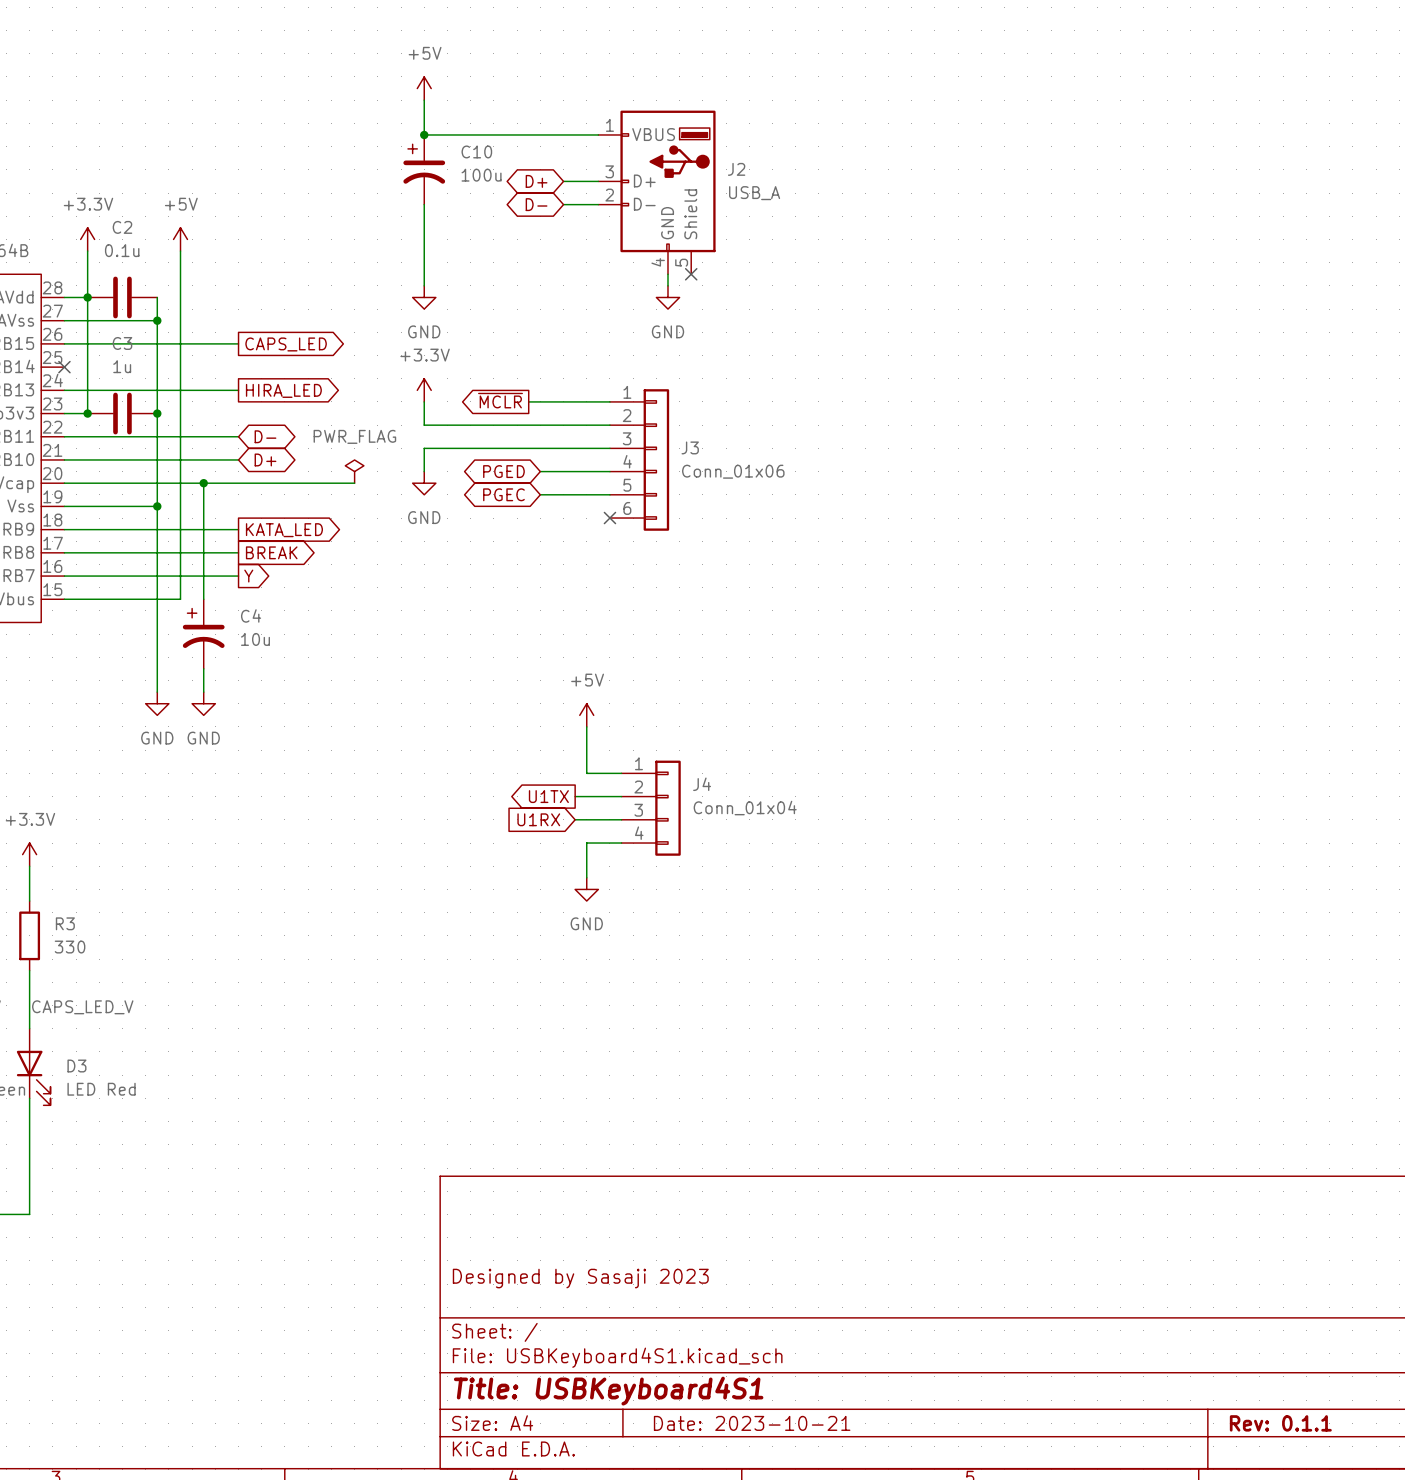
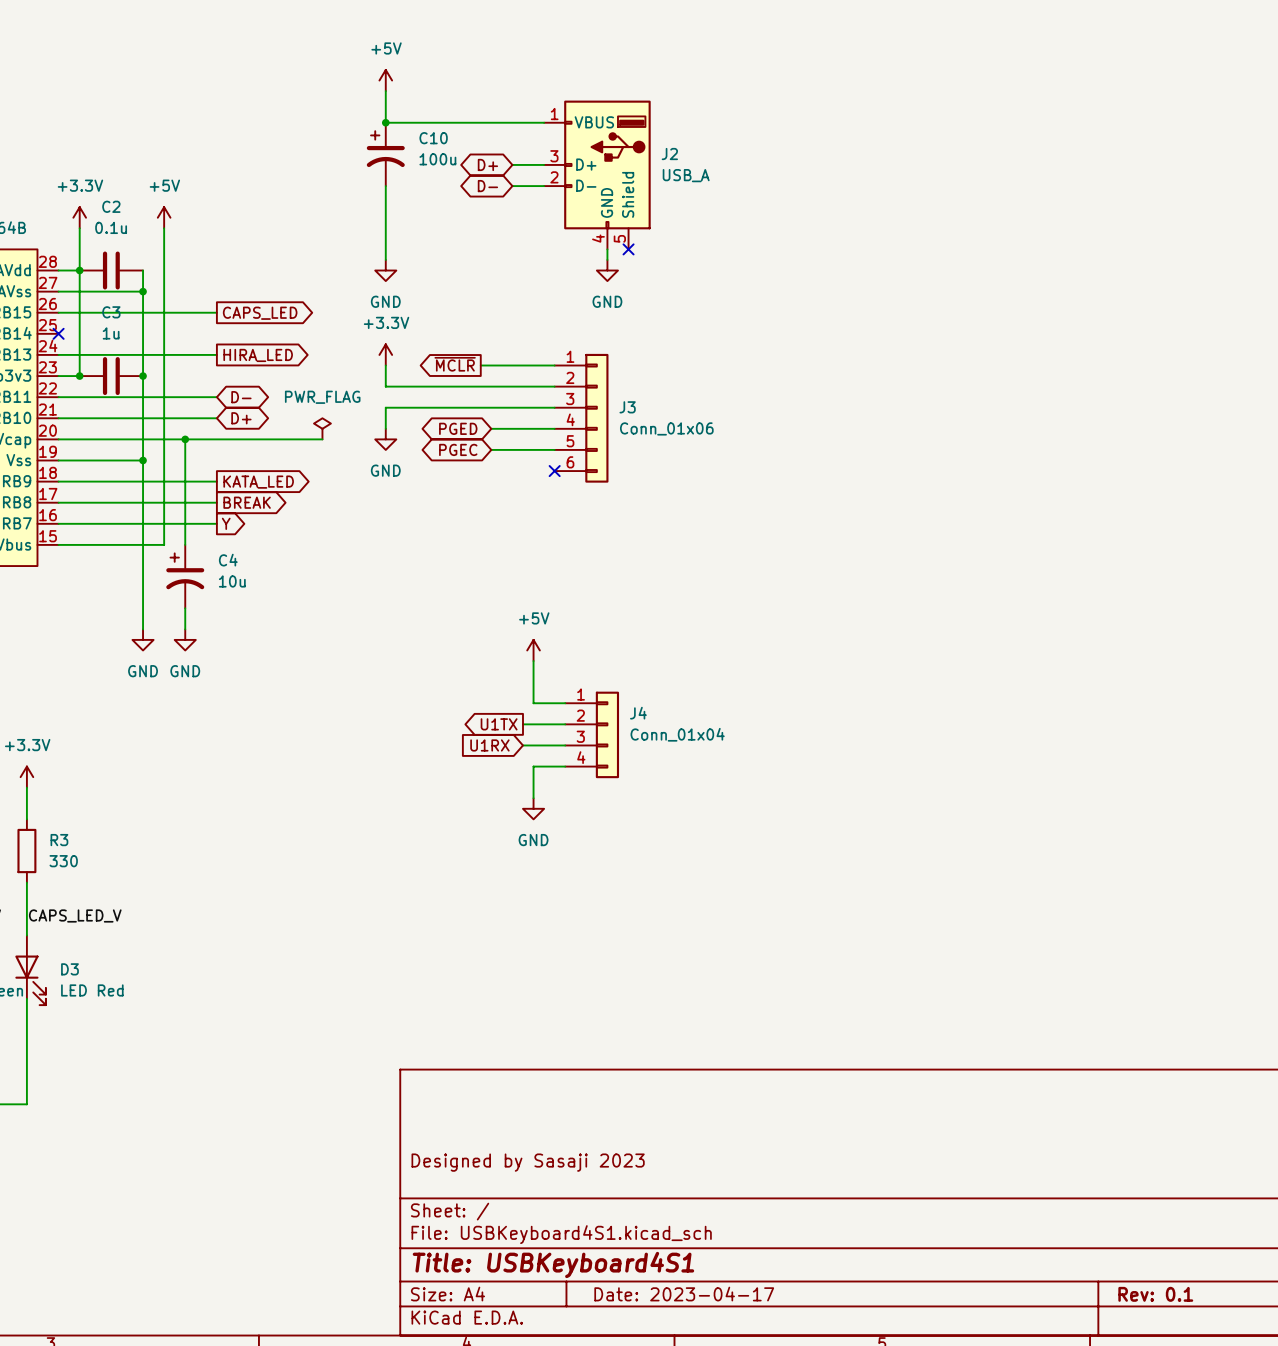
title block: Date: 2023-10-21 (752, 1423) -> Date: 2023-04-17 (684, 1294)
title block: Rev: 0.1.1 (1280, 1423) -> Rev: 0.1 (1155, 1294)

